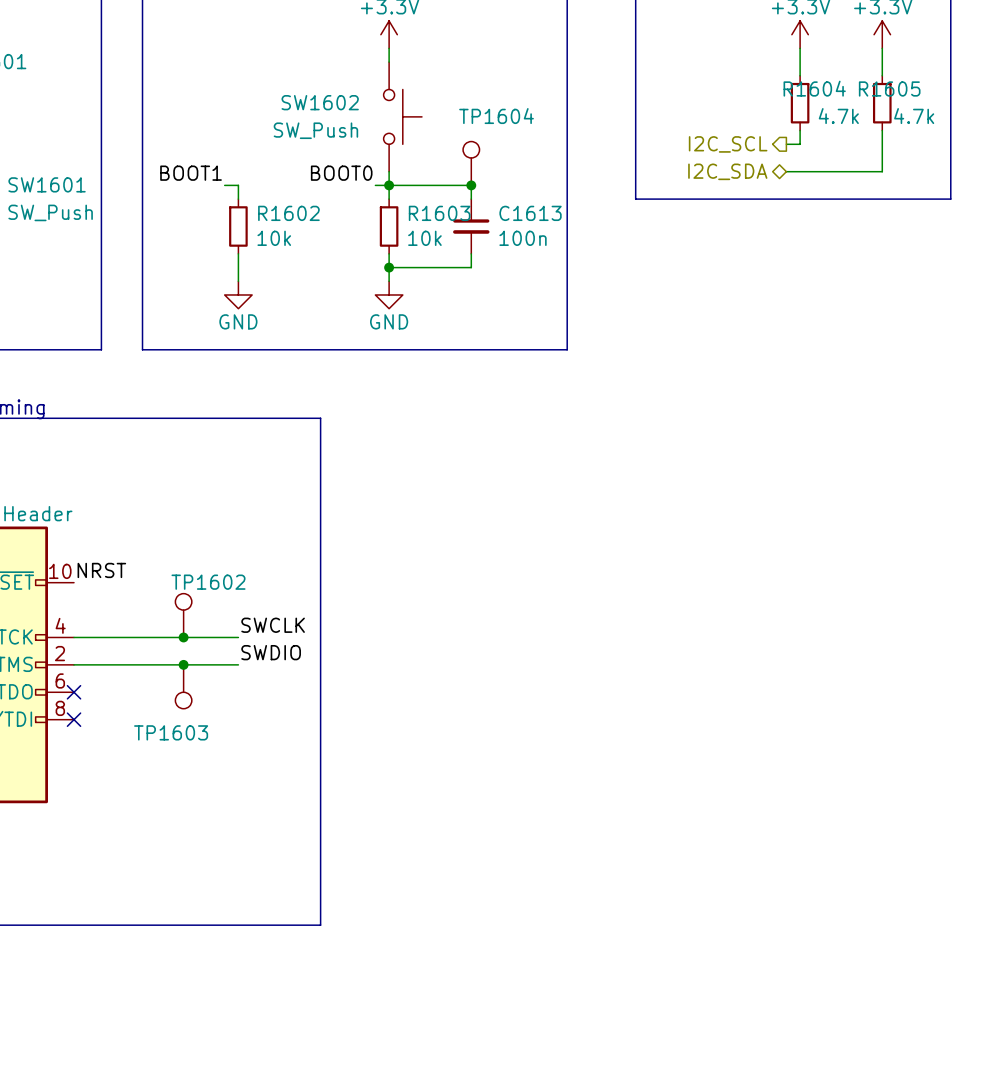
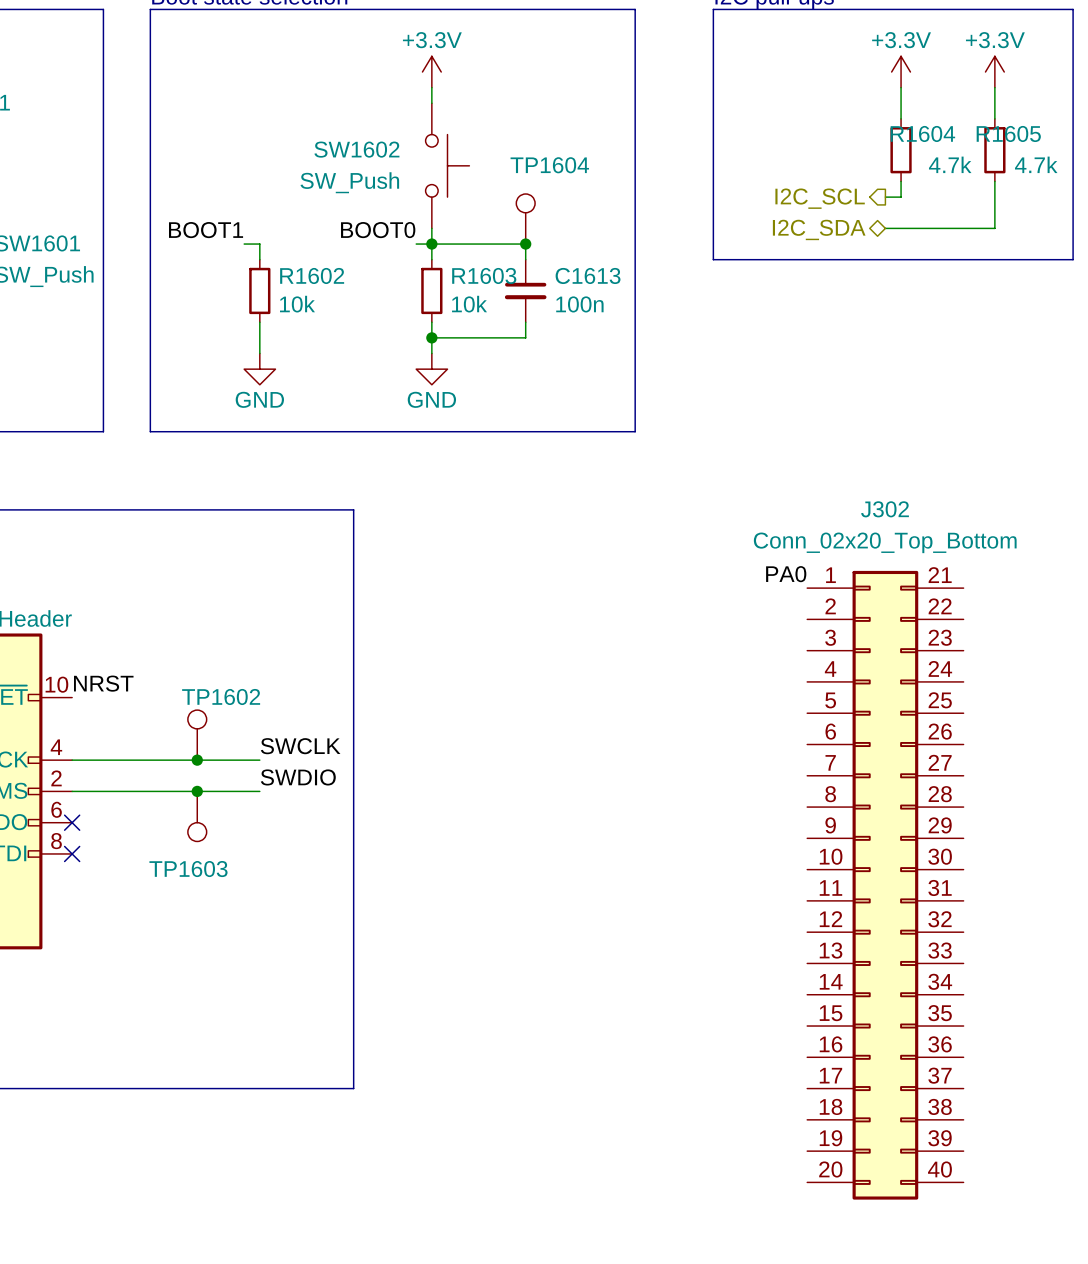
label: none -> PA0 (786, 574)
J302: none -> Conn_02x20_Top_Bottom (885, 885)

